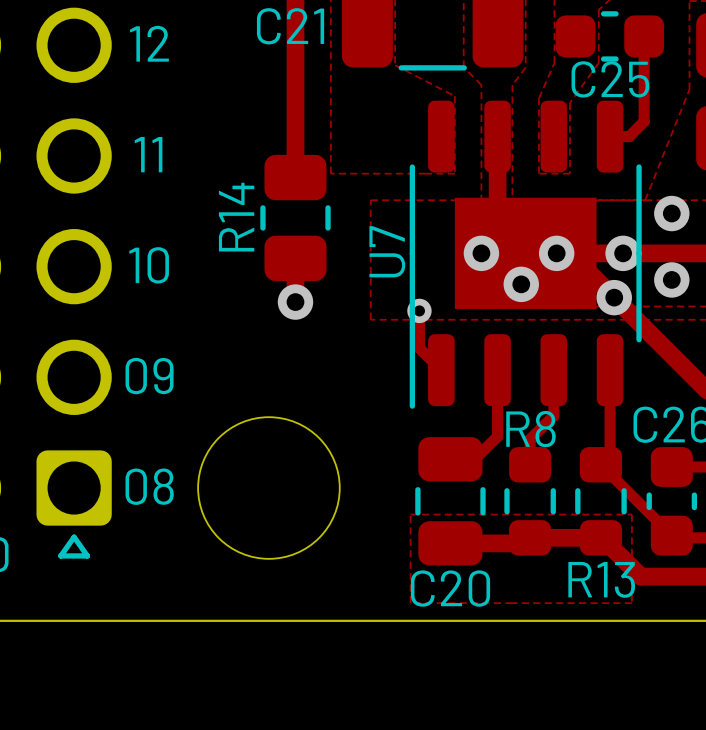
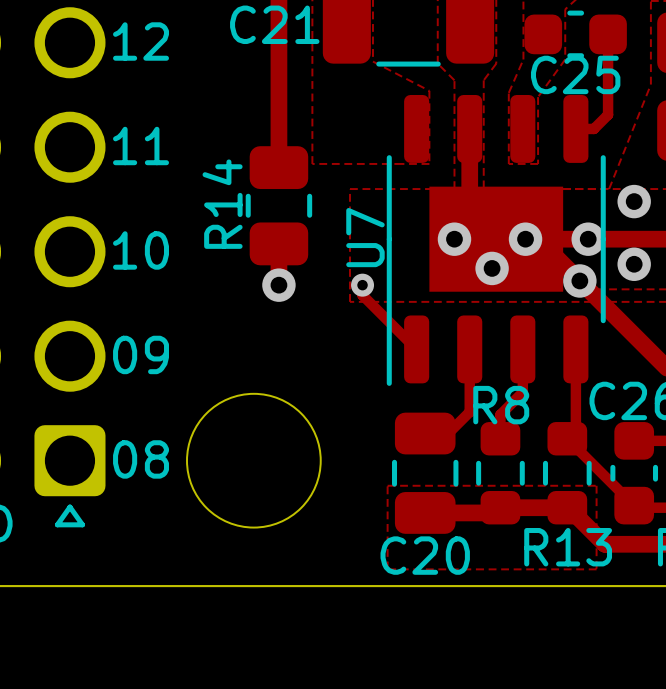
track: (419, 310) (419, 348) -> (362, 285) (362, 295) (395, 328)
via position: (419, 310) -> (362, 285)

